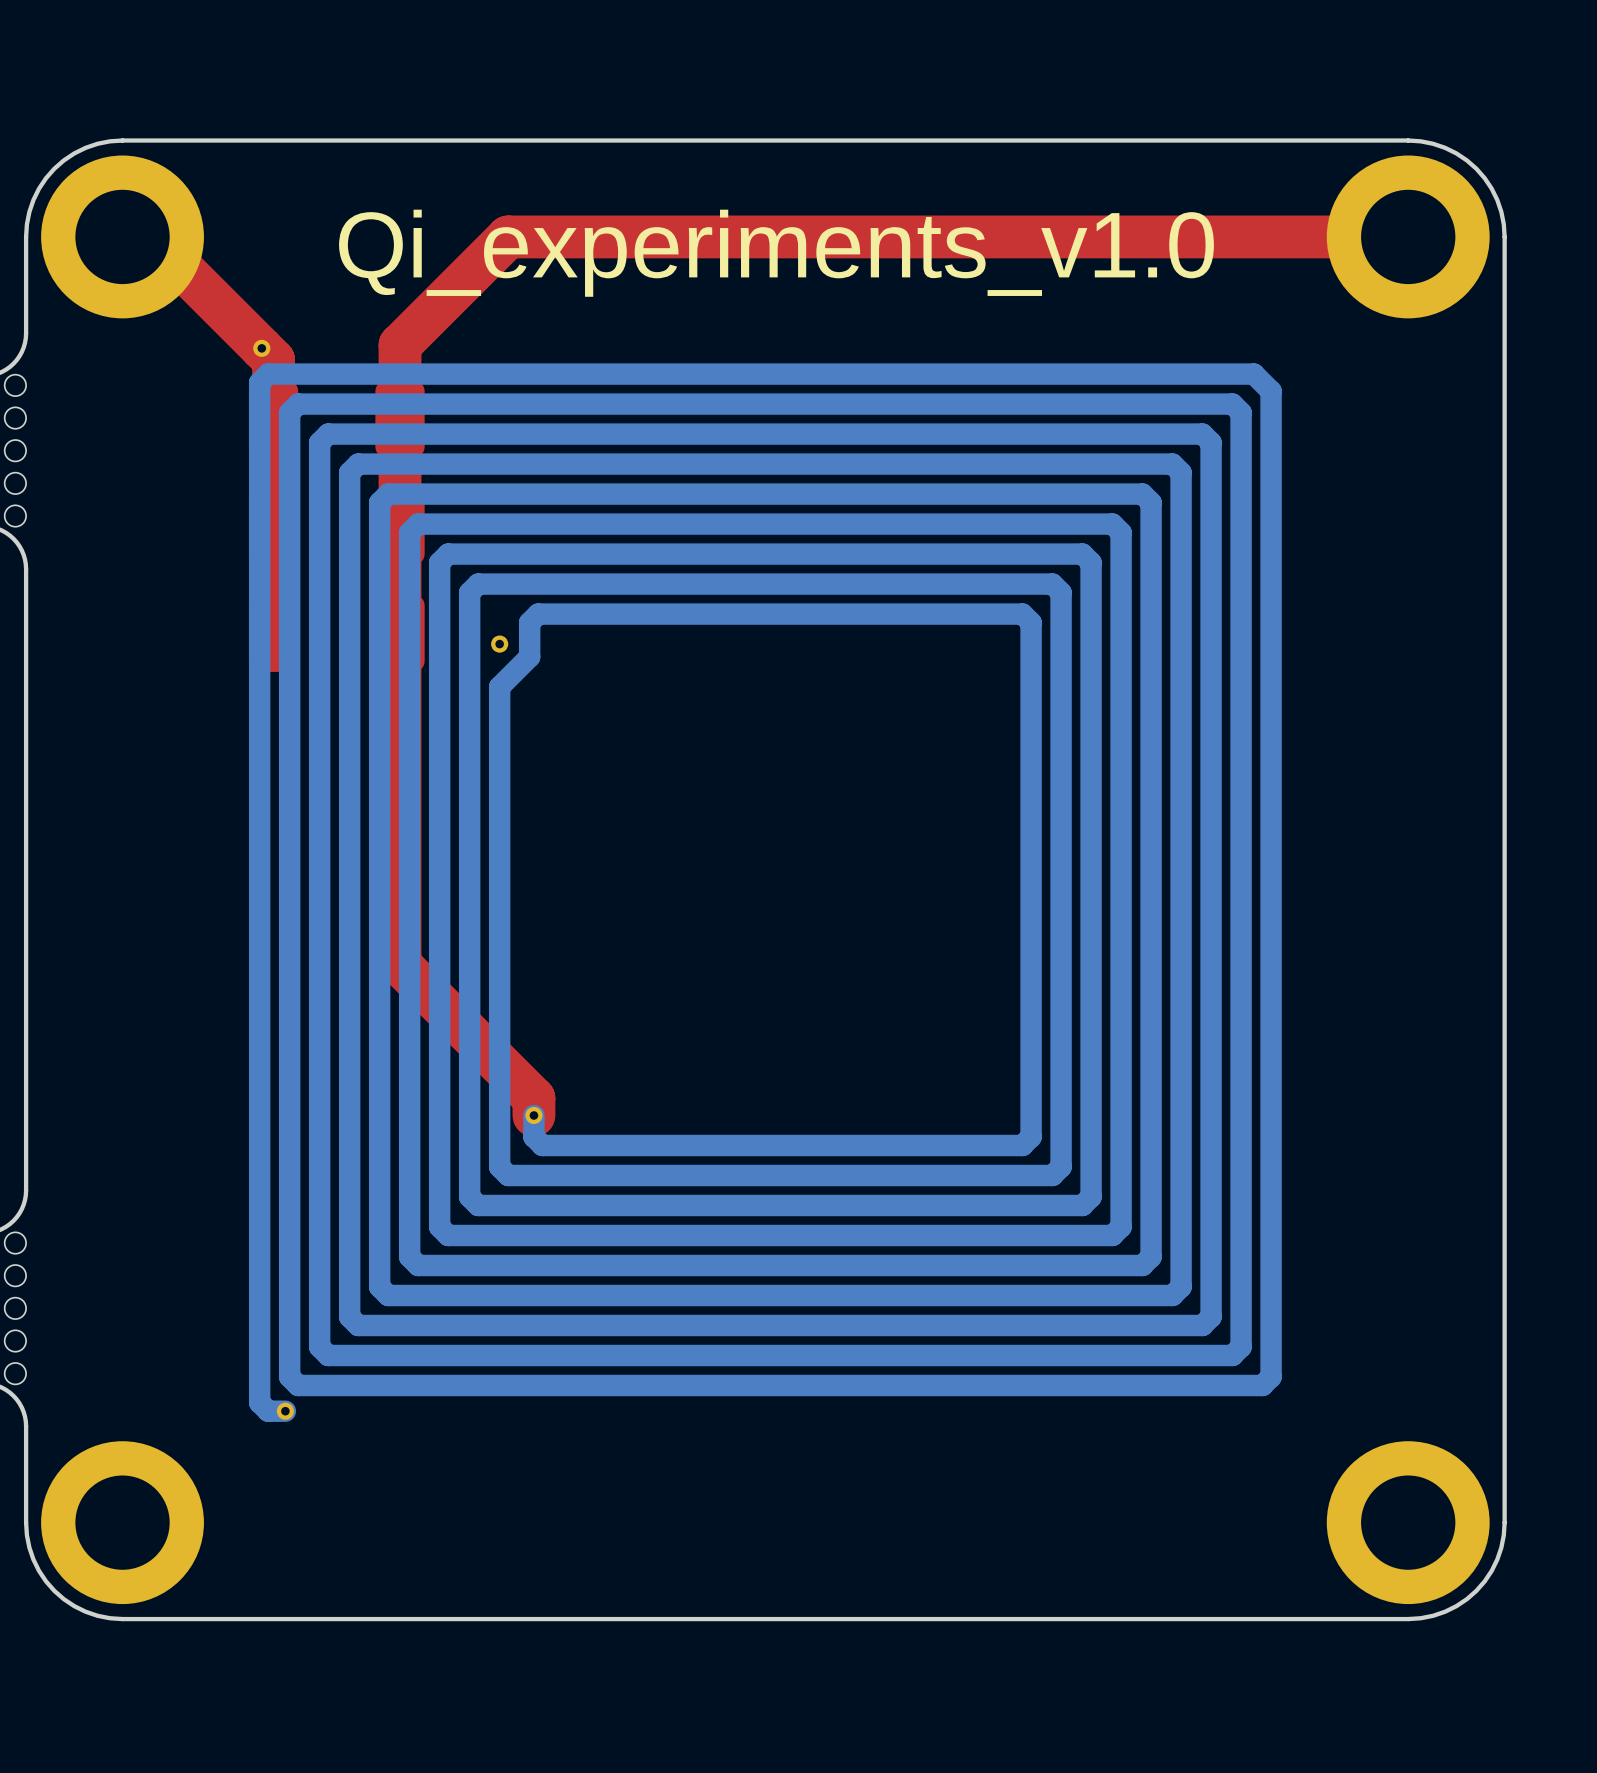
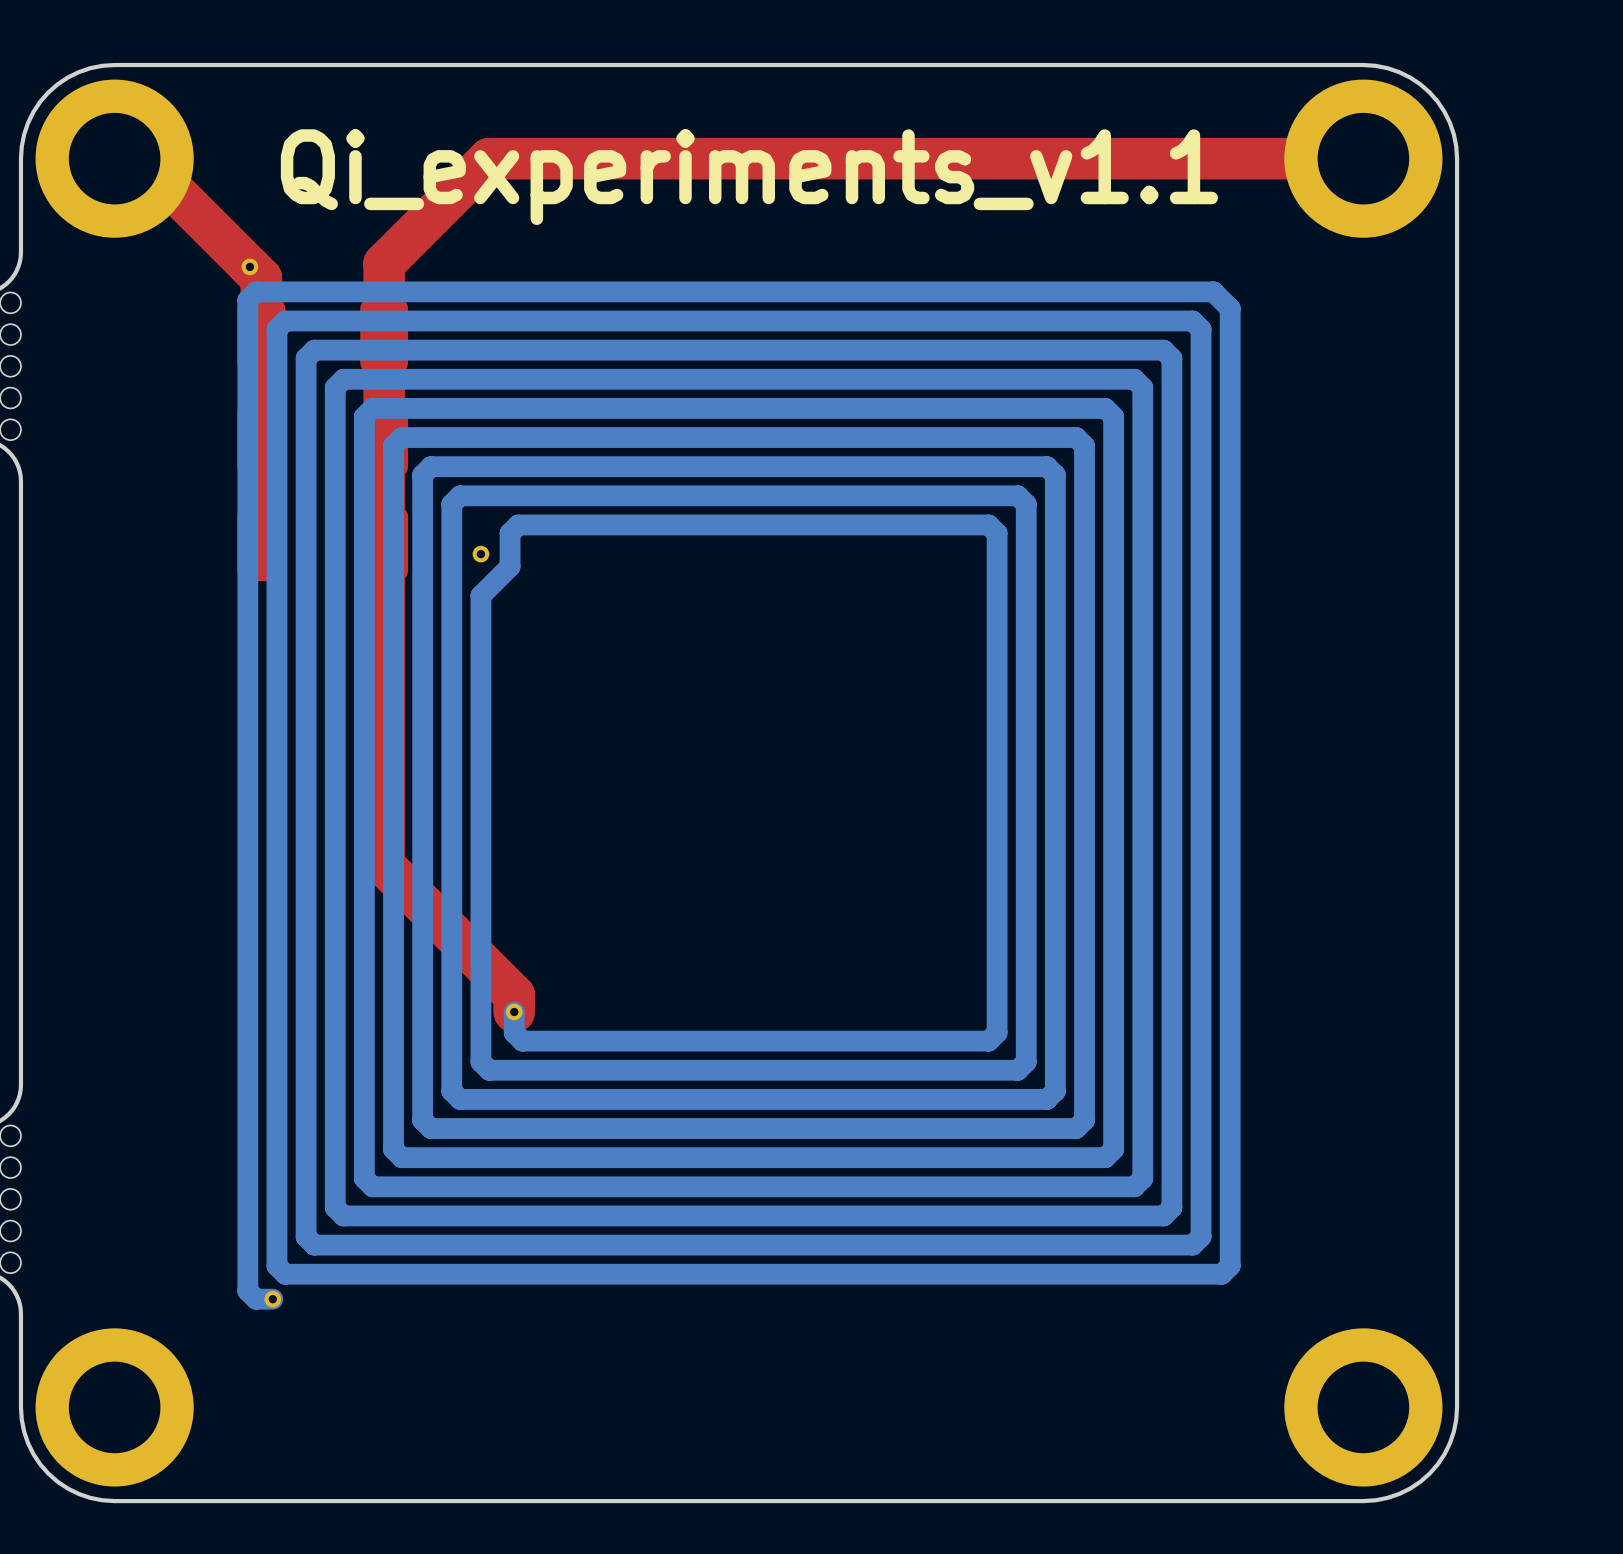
text: Qi_experiments_v1.0 (776, 253) -> Qi_experiments_v1.1 (749, 177)

